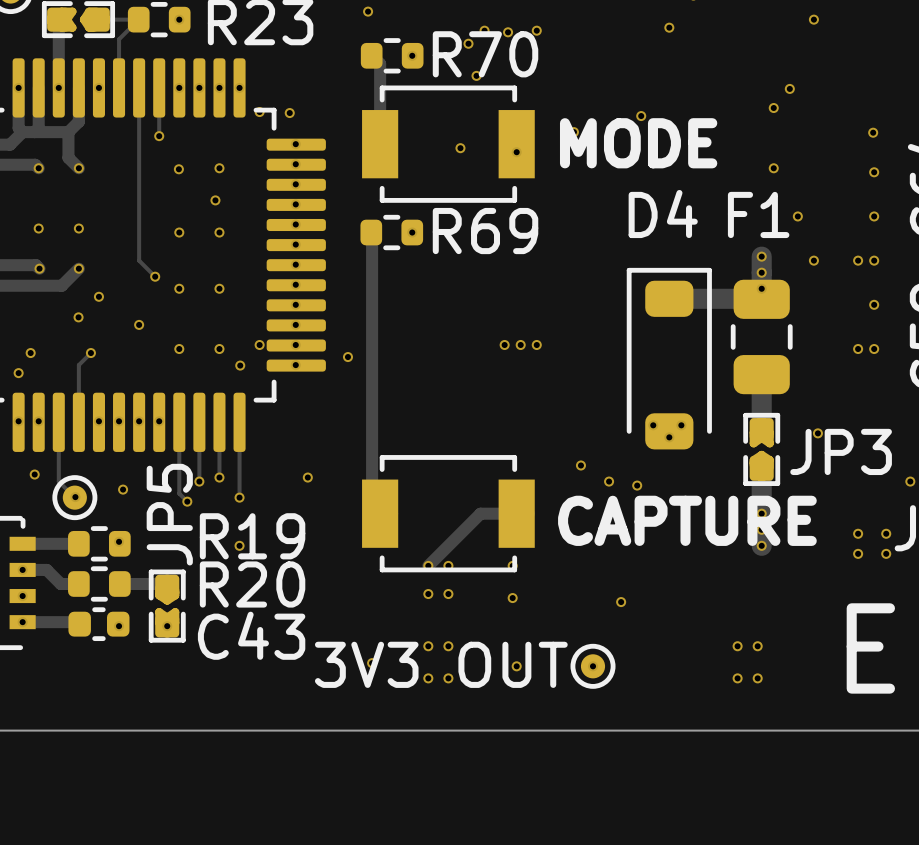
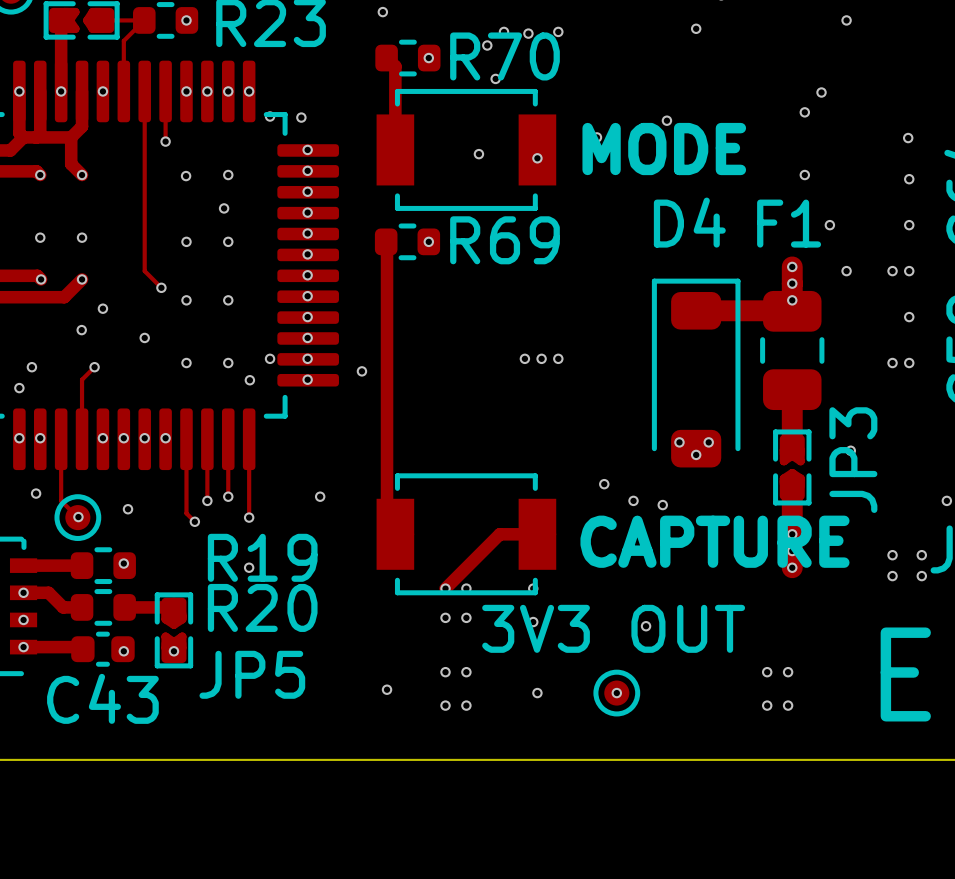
JP3 name rotation: 0° (841, 451) -> 90° counterclockwise (853, 460)
JP5 name rotation: 0° (169, 514) -> 90° clockwise (252, 674)
JP5 name position: JP5 (169, 514) -> JP5 (252, 674)
C43 name position: C43 (251, 635) -> C43 (102, 698)
part value position: 3V3 OUT (441, 664) -> 3V3 OUT (613, 628)

